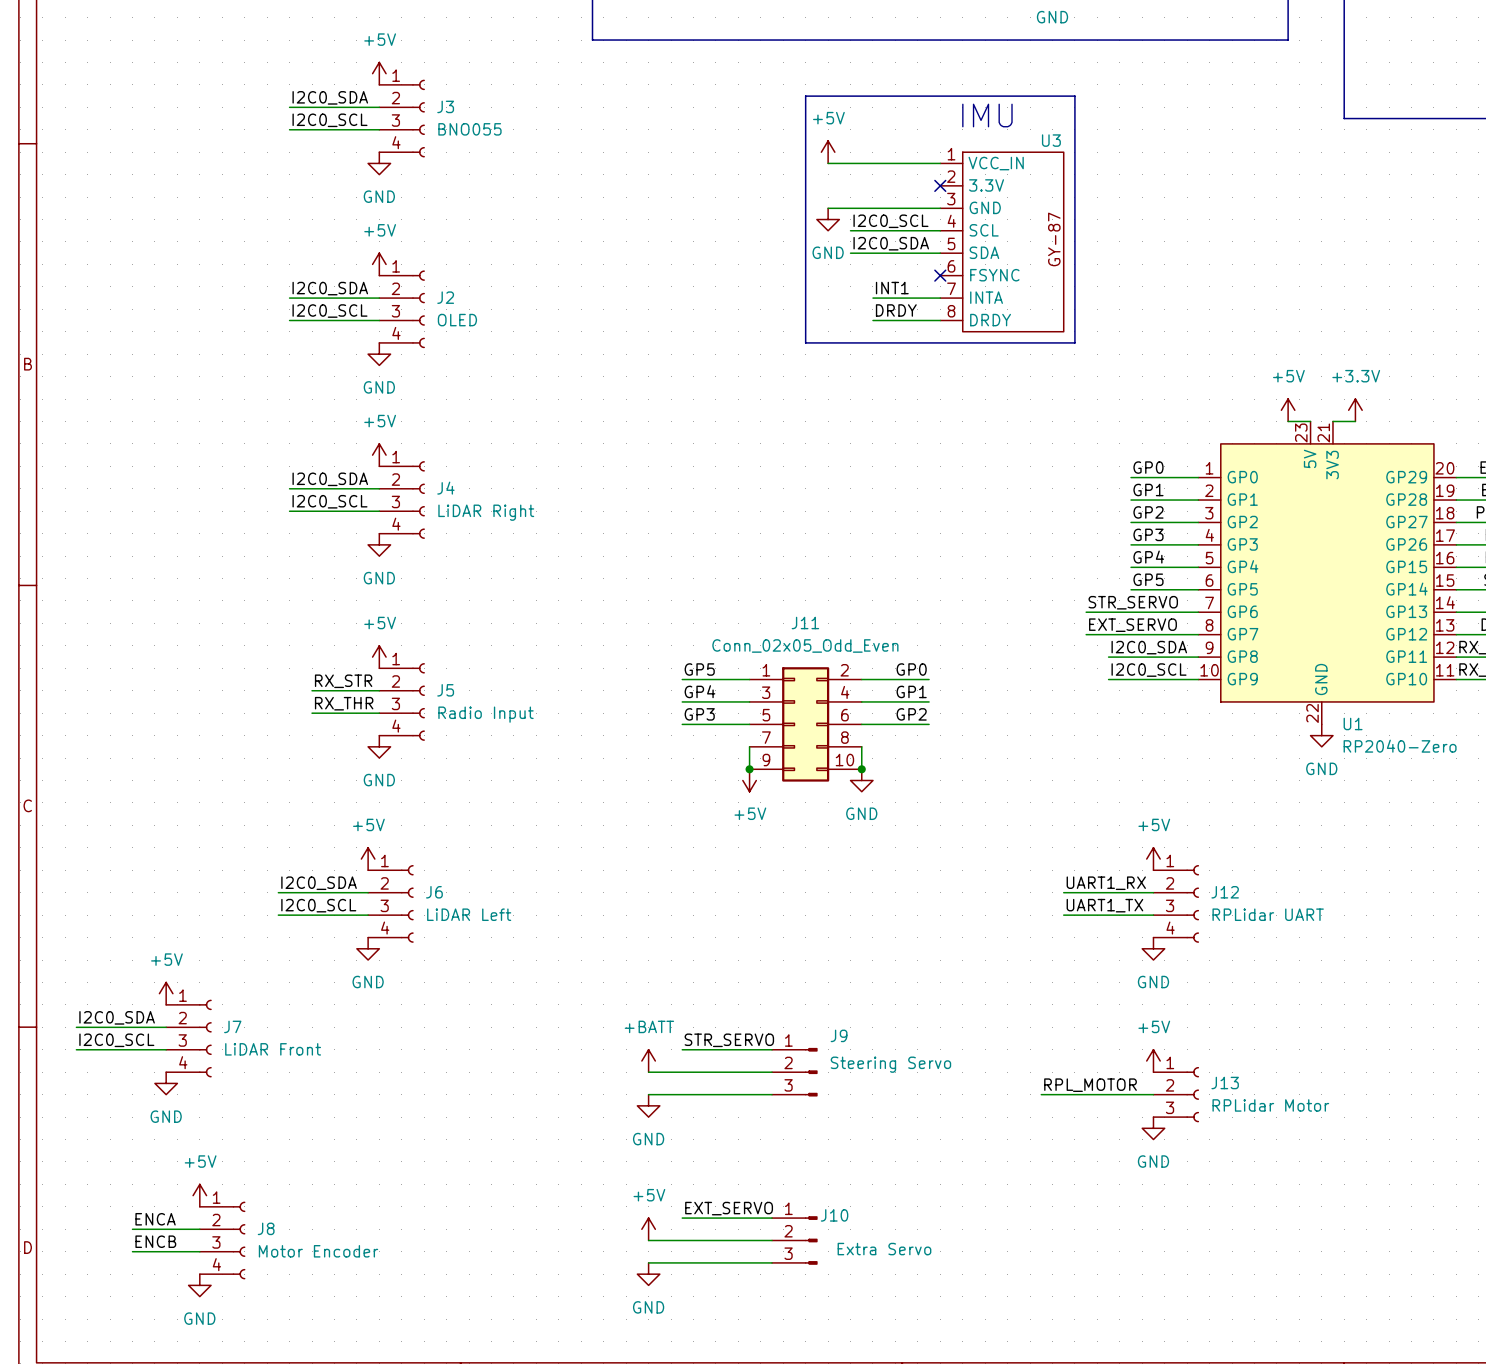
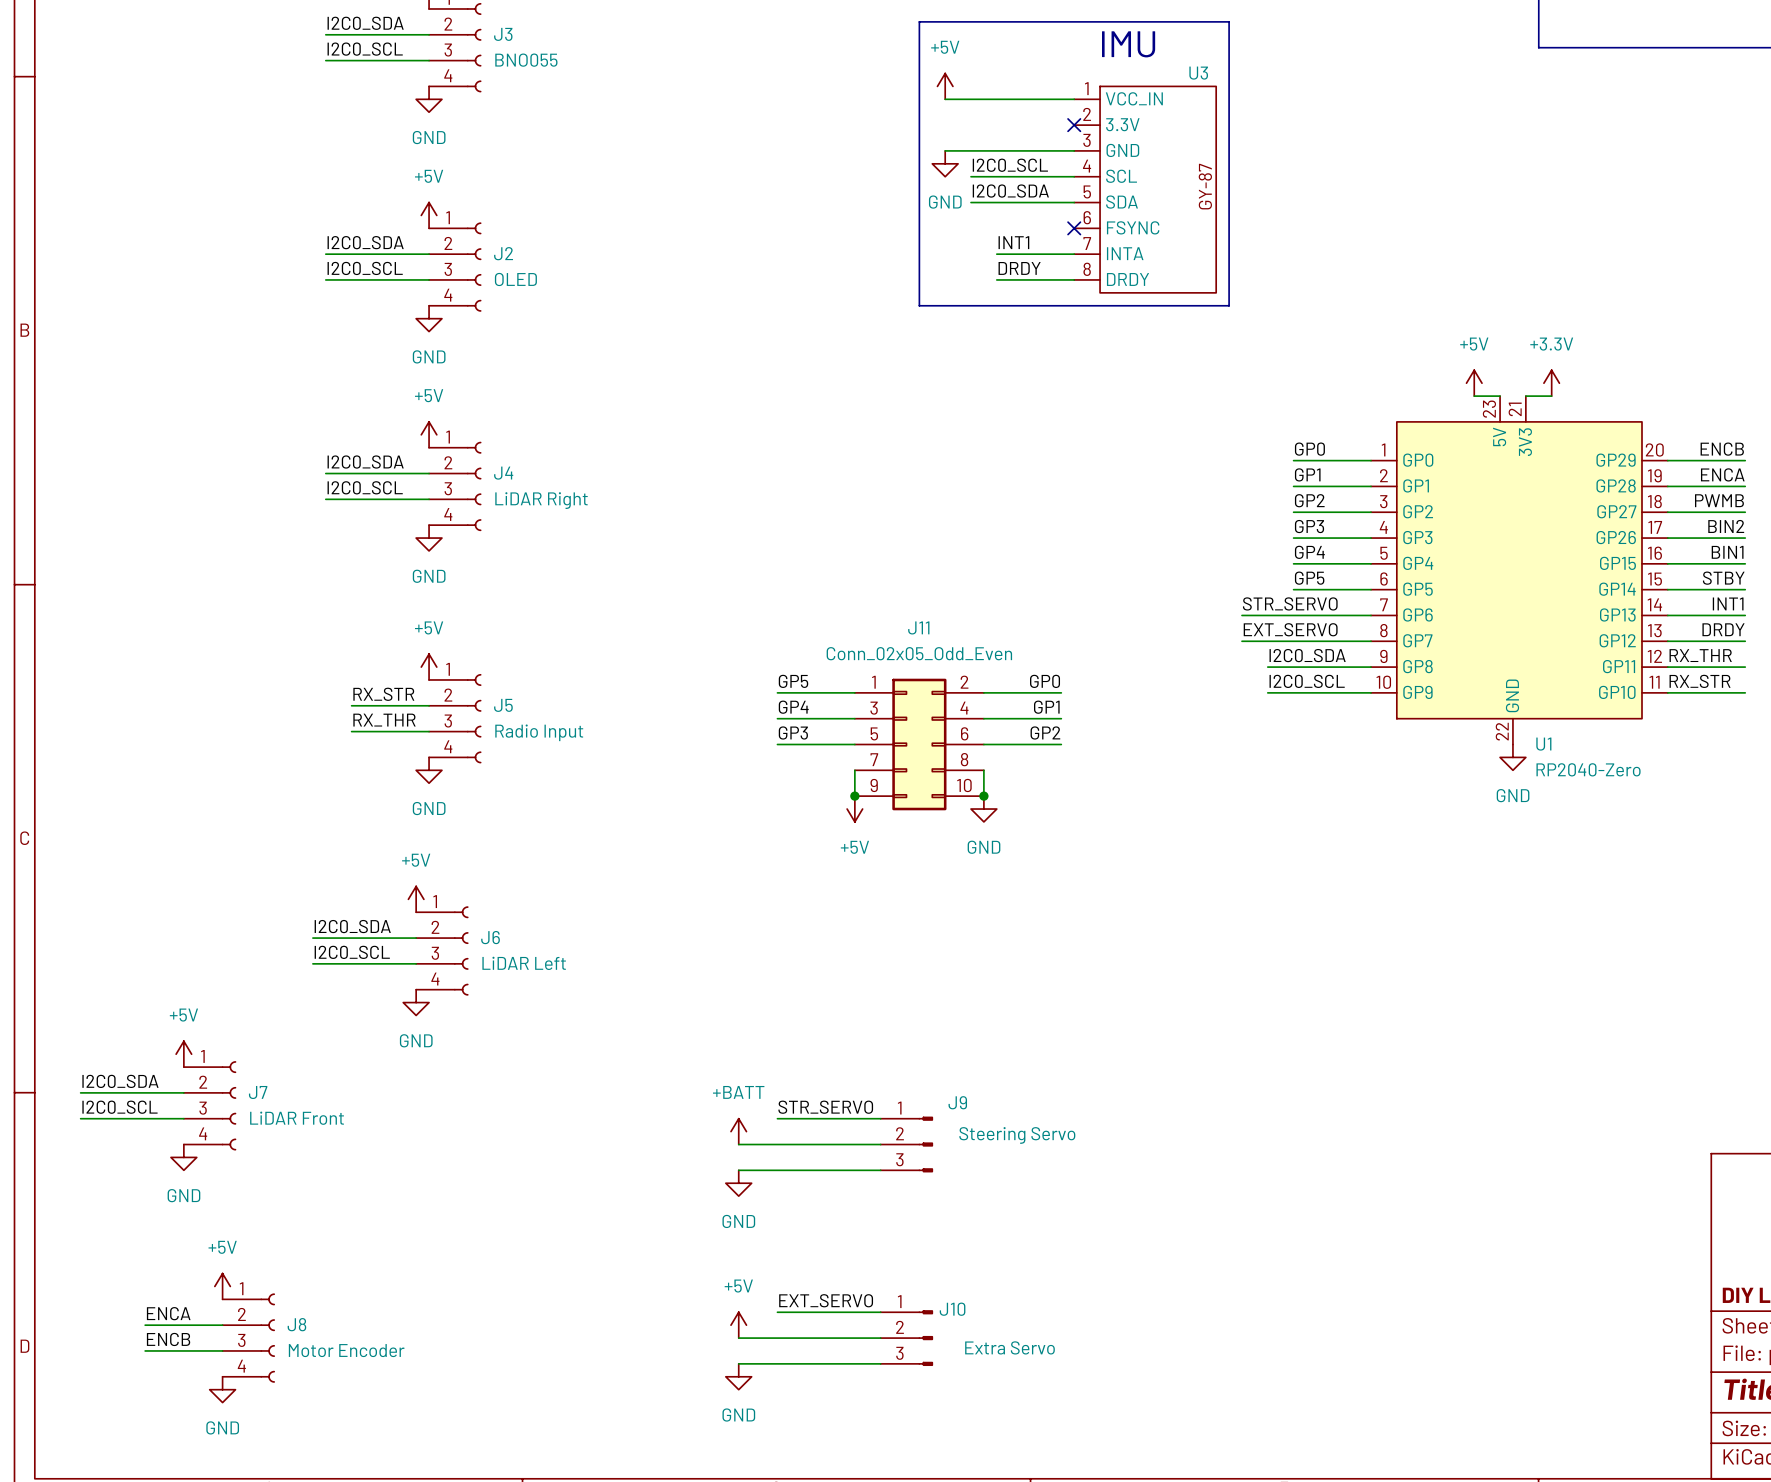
power symbol: +5V (1153, 859) -> none
label: UART1_RX (1106, 883) -> none
wire: (1063, 892) (1153, 892) -> none
J12: RPLidar UART (1176, 903) -> none
label: UART1_TX (1104, 905) -> none
wire: (1063, 915) (1153, 915) -> none
power symbol: GND (1153, 948) -> none
power symbol: +5V (1153, 1060) -> none
label: RPL_MOTOR (1090, 1085) -> none
wire: (1041, 1094) (1153, 1094) -> none
J13: RPLidar Motor (1176, 1094) -> none
power symbol: GND (1153, 1128) -> none

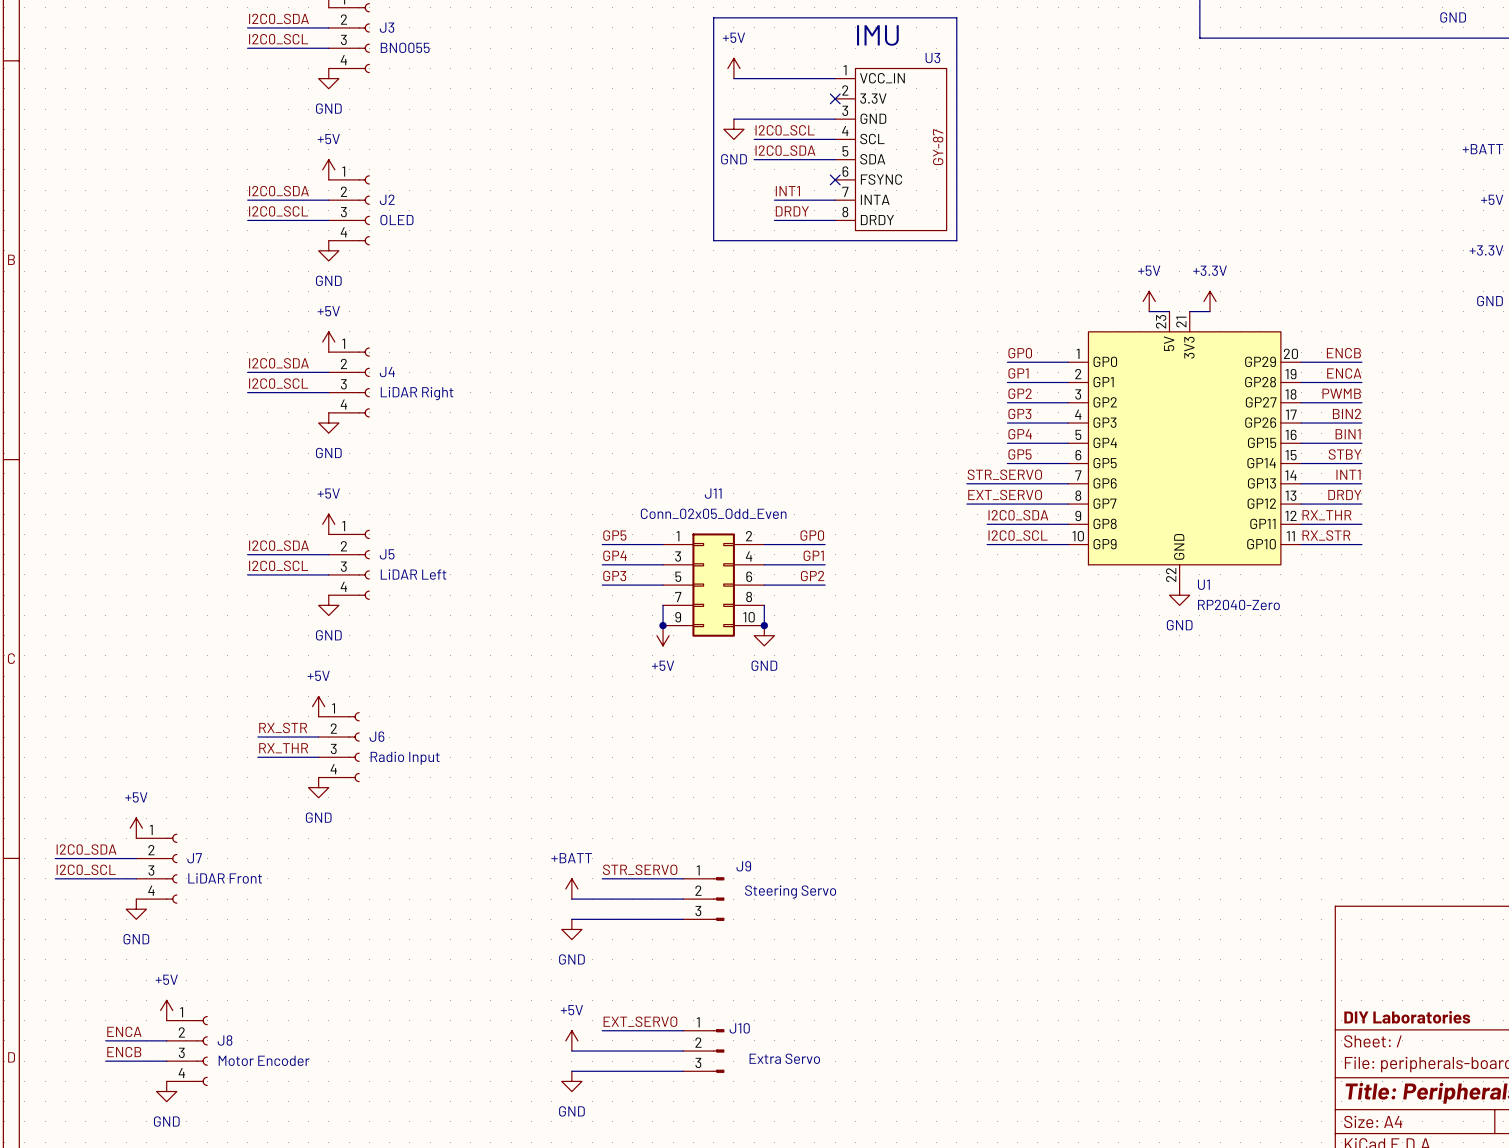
label position: RX_STR (383, 694) -> RX_STR (283, 727)
wire: none -> (247, 554) (267, 554)
label position: RX_THR (384, 720) -> RX_THR (283, 748)
J5 value: Radio Input (539, 732) -> LiDAR Left (413, 574)
label position: I2C0_SDA (352, 926) -> I2C0_SDA (278, 545)
wire: (312, 938) (338, 938) -> (247, 574) (267, 574)
label position: I2C0_SCL (352, 952) -> I2C0_SCL (278, 565)
wire: (312, 963) (338, 963) -> none
J6 value: LiDAR Left (524, 963) -> Radio Input (405, 758)

